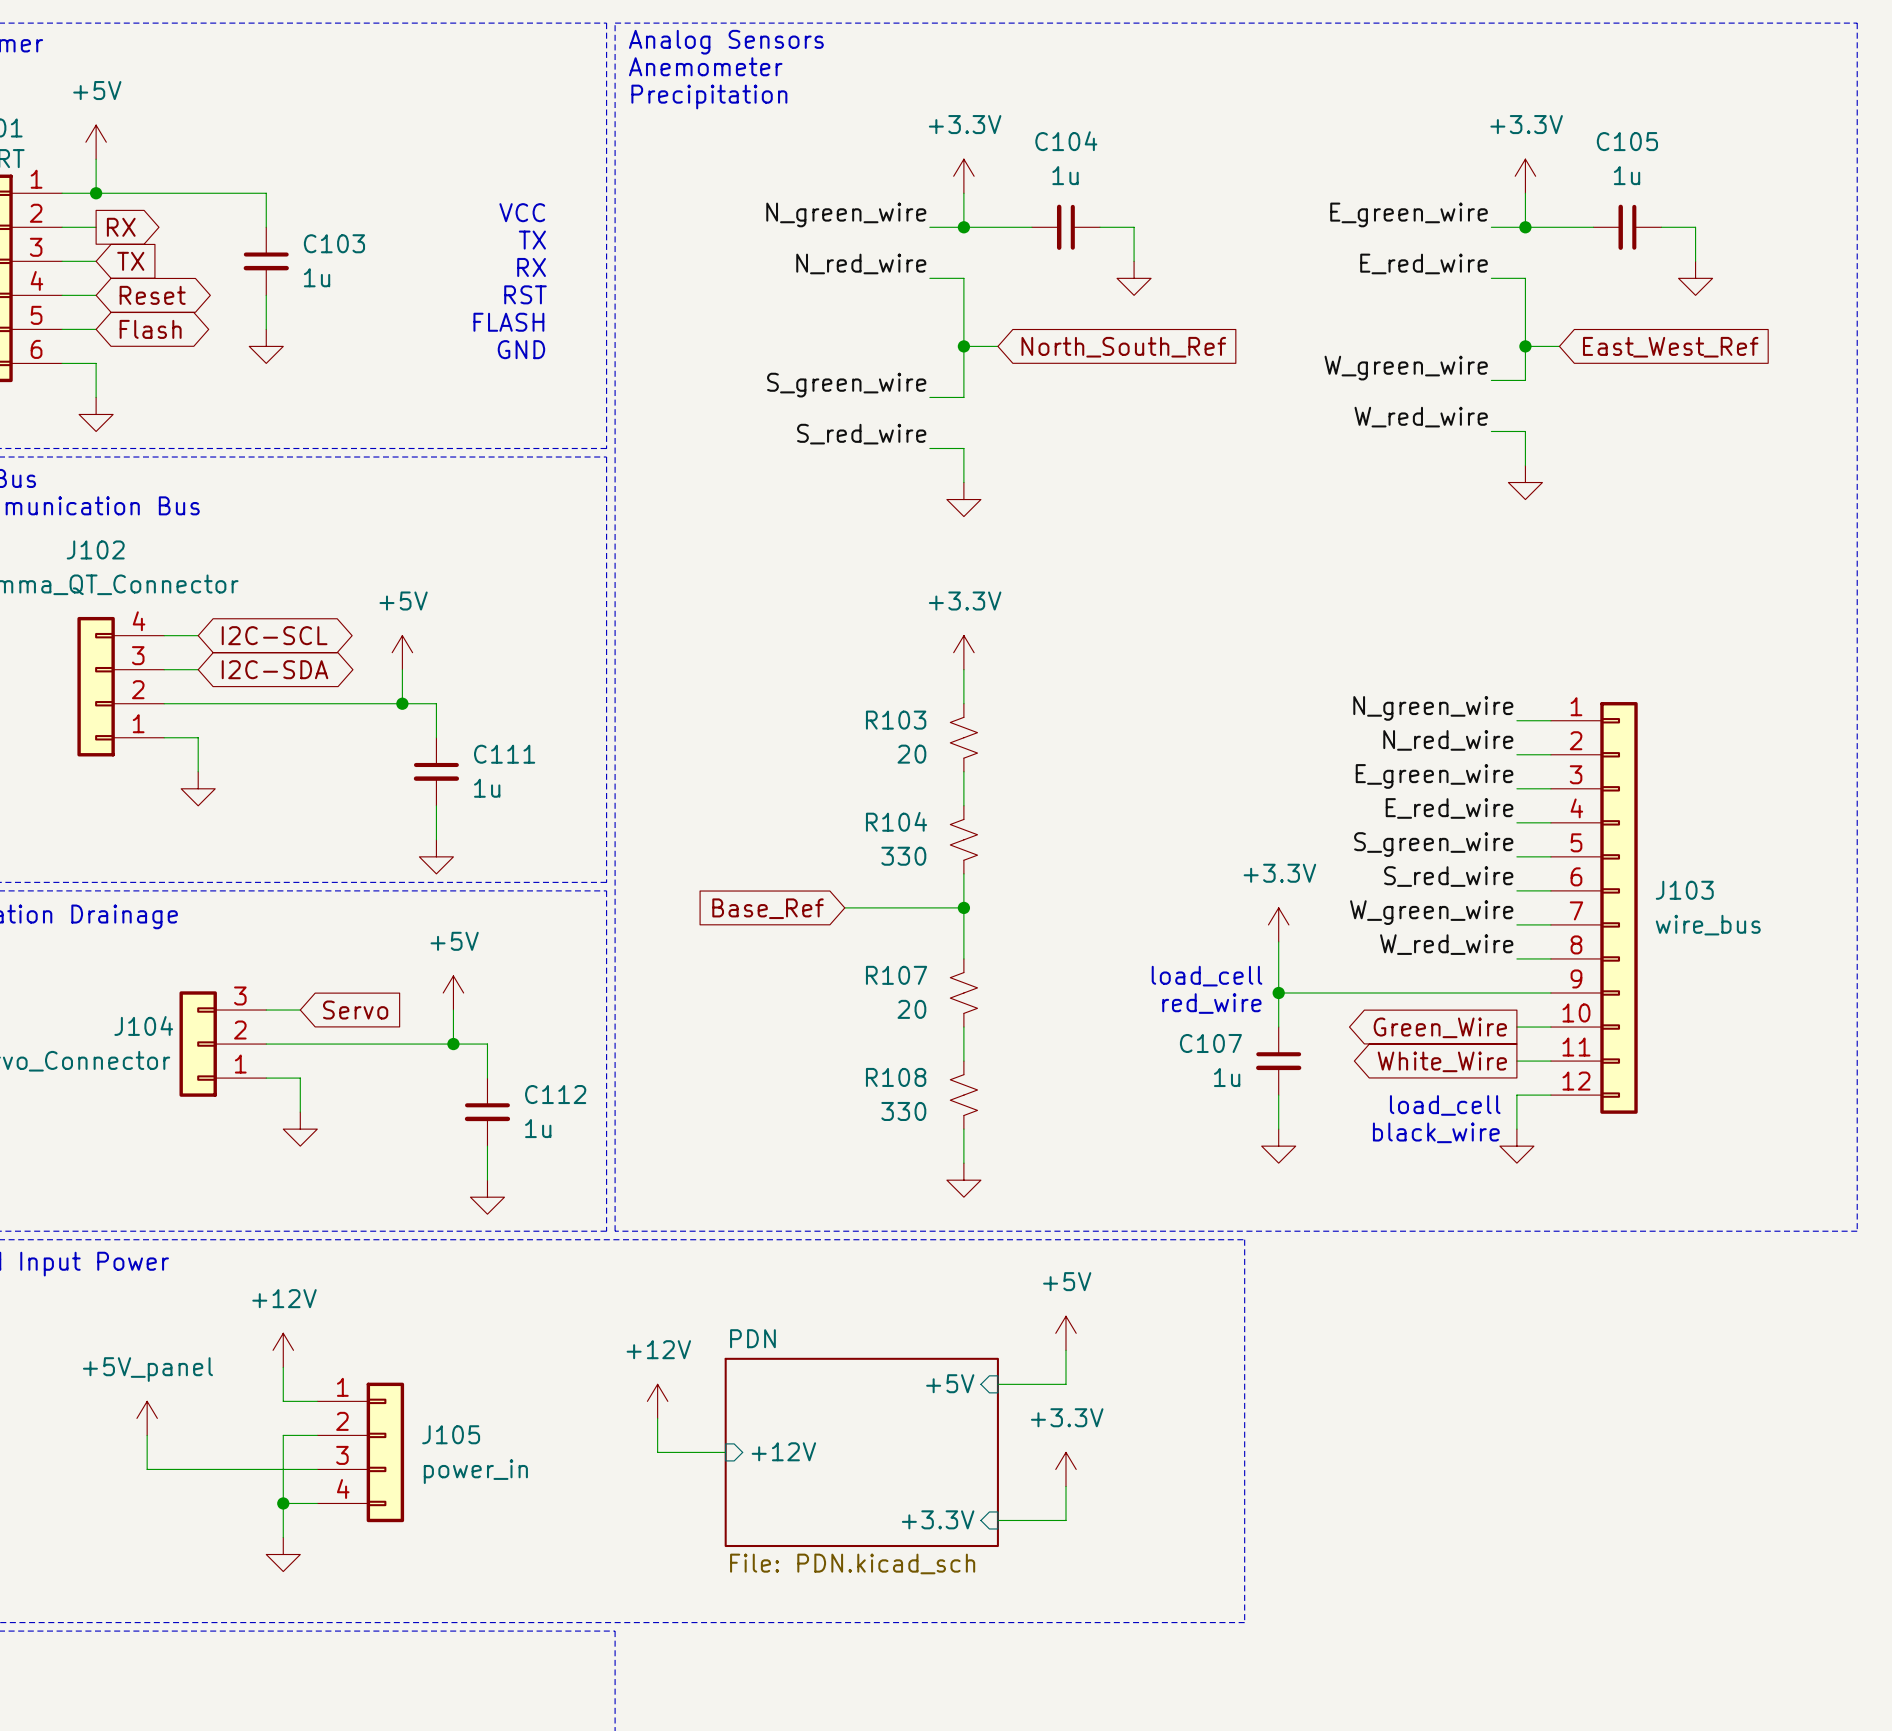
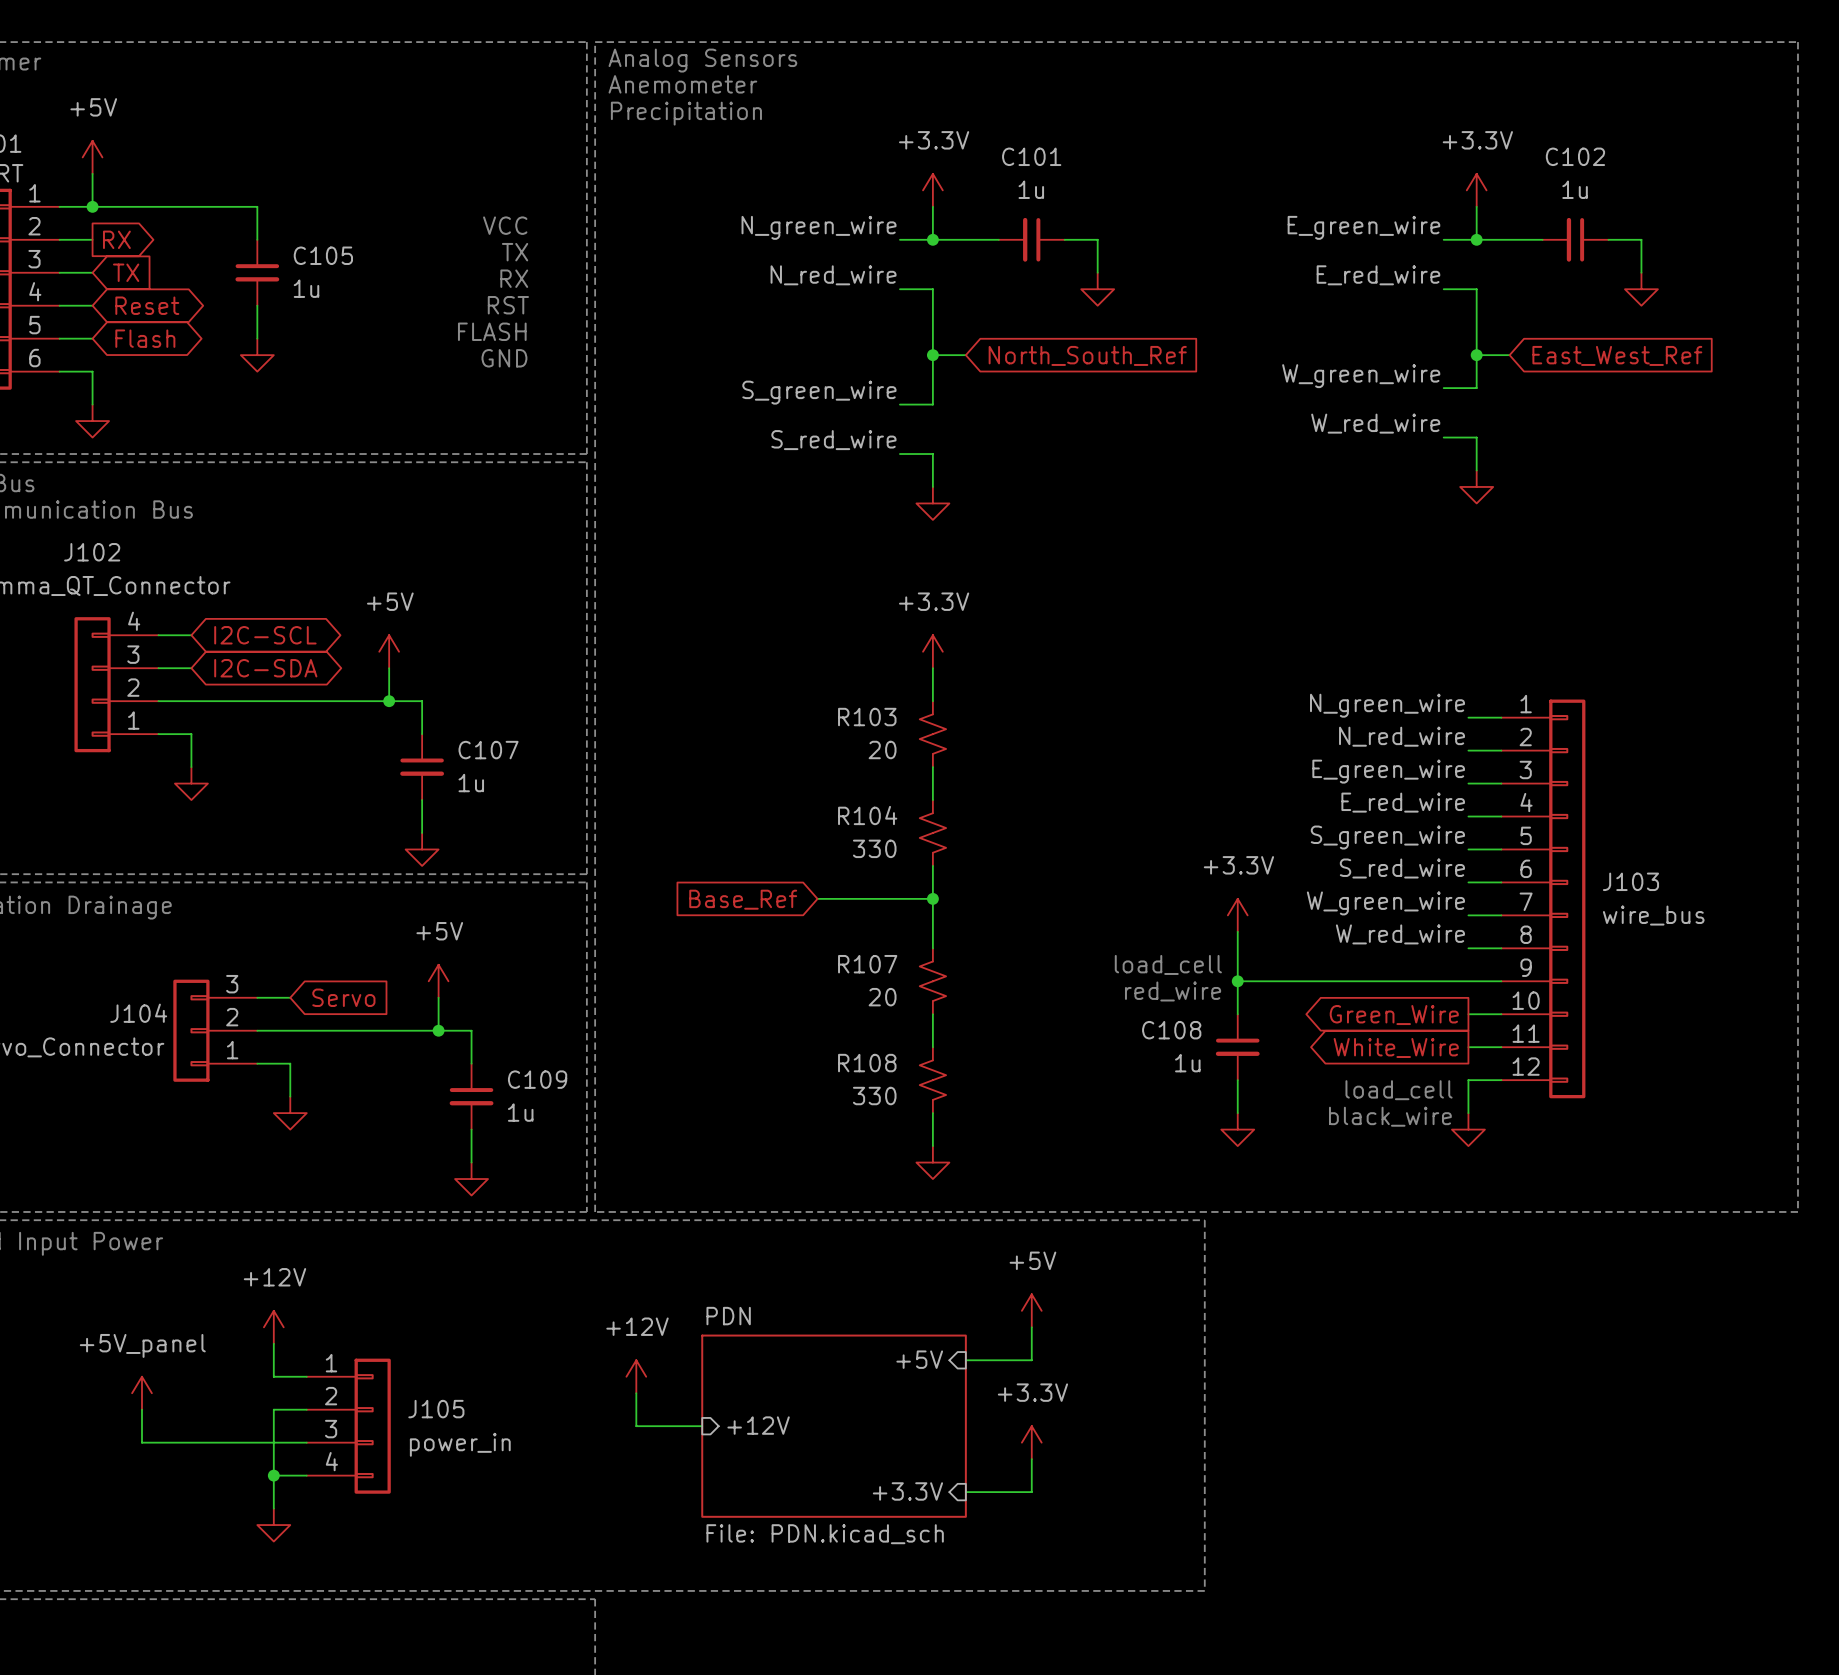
C104 name: C104 (1066, 141) -> C101 (1031, 156)
C105 name: C105 (1627, 141) -> C102 (1575, 156)
C103 name: C103 (334, 243) -> C105 (323, 255)
C111 name: C111 (504, 754) -> C107 (488, 750)
C107 name: C107 (1210, 1043) -> C108 (1171, 1030)
C112 name: C112 (555, 1094) -> C109 (537, 1079)

